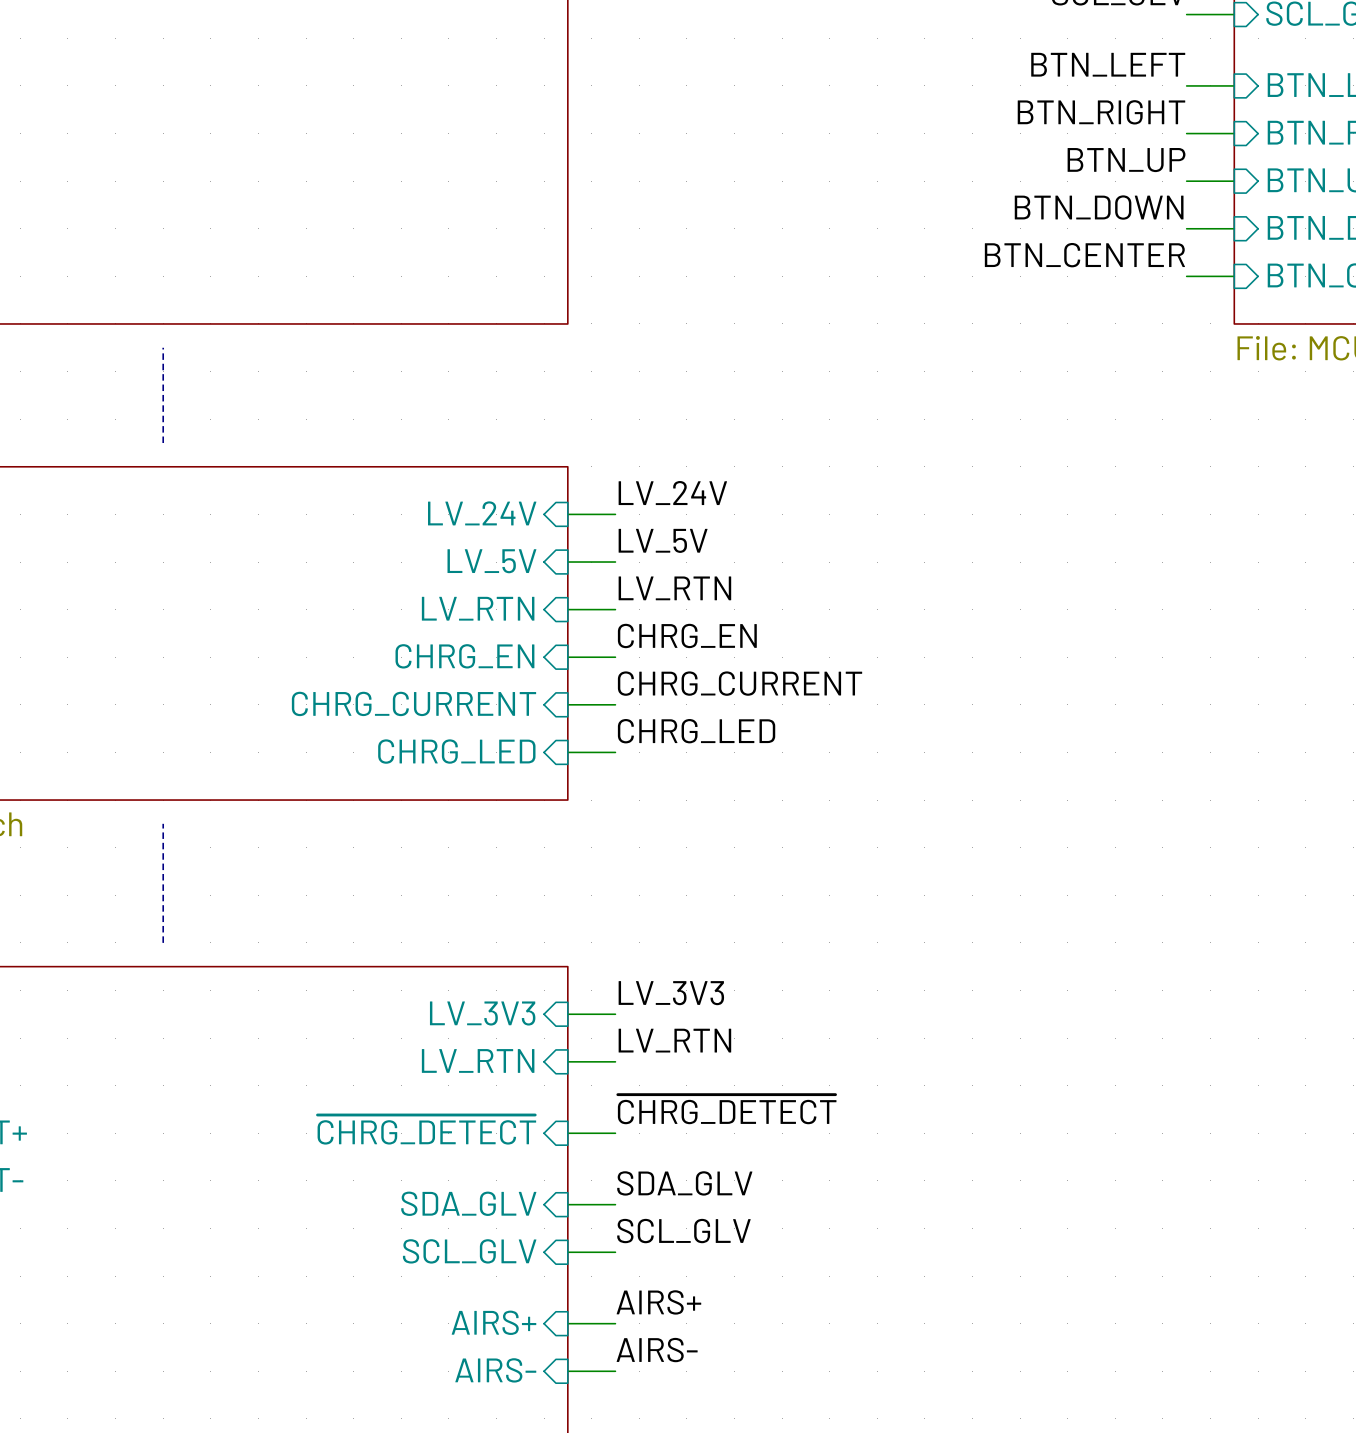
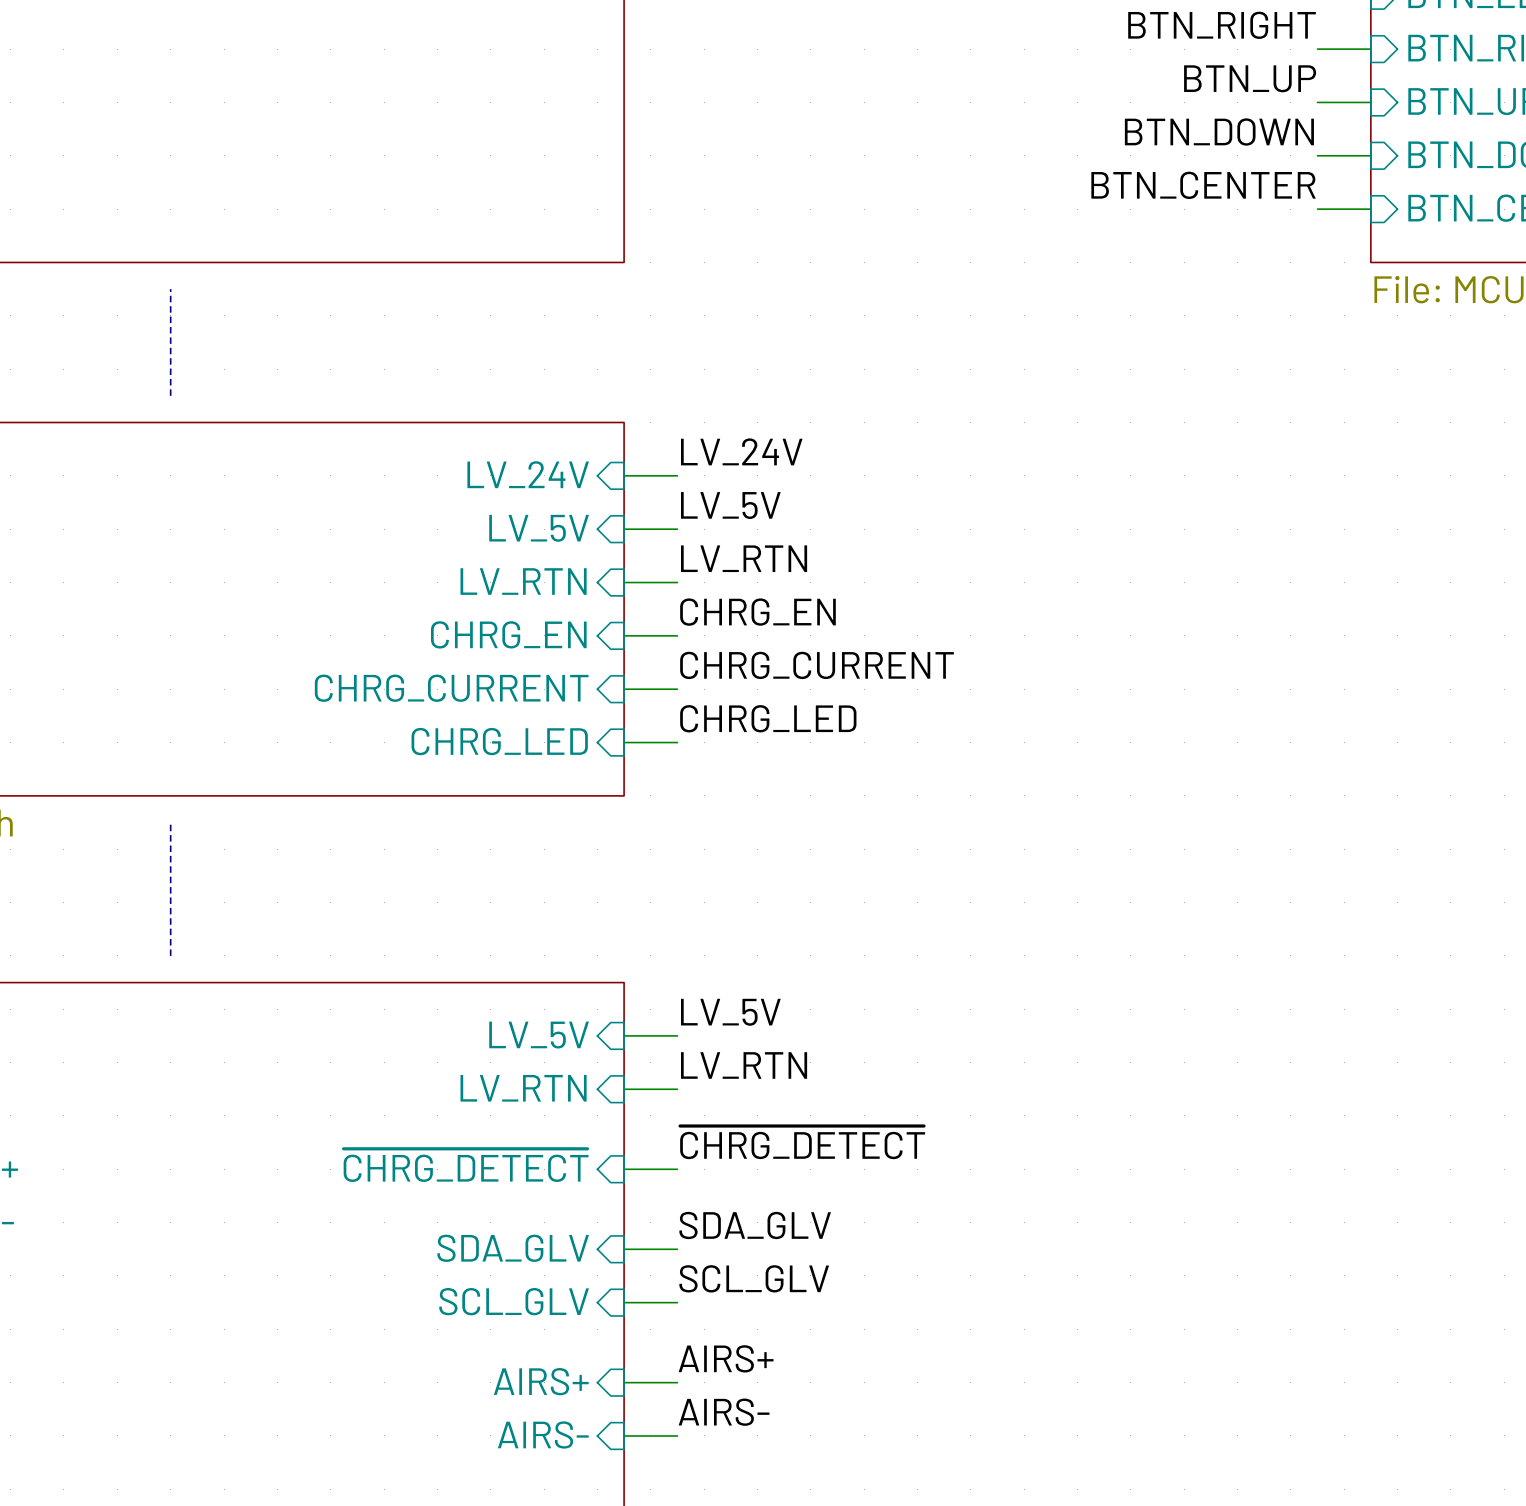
label: LV_3V3 (671, 993) -> LV_5V (730, 1012)
sheet pin: LV_3V3 (482, 1013) -> LV_5V (539, 1035)

